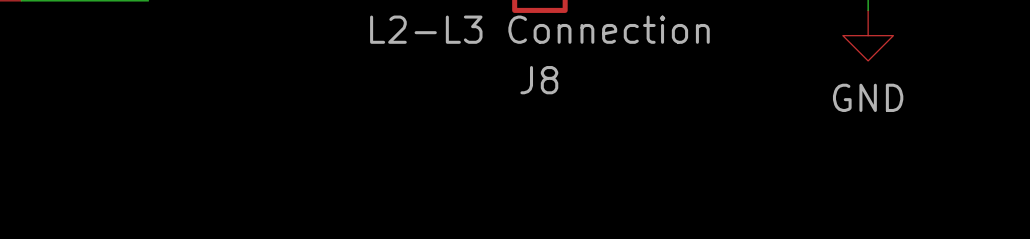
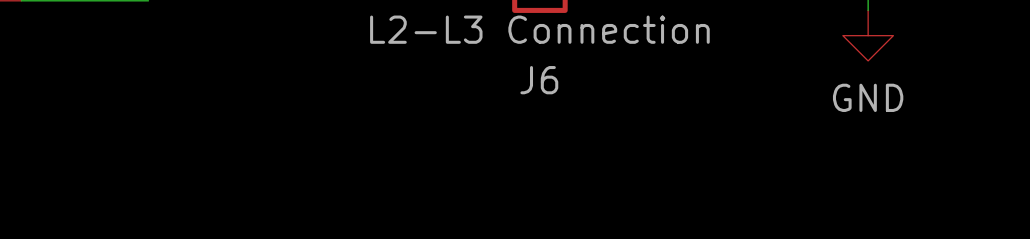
J8 name: J8 (539, 80) -> J6 (539, 80)

